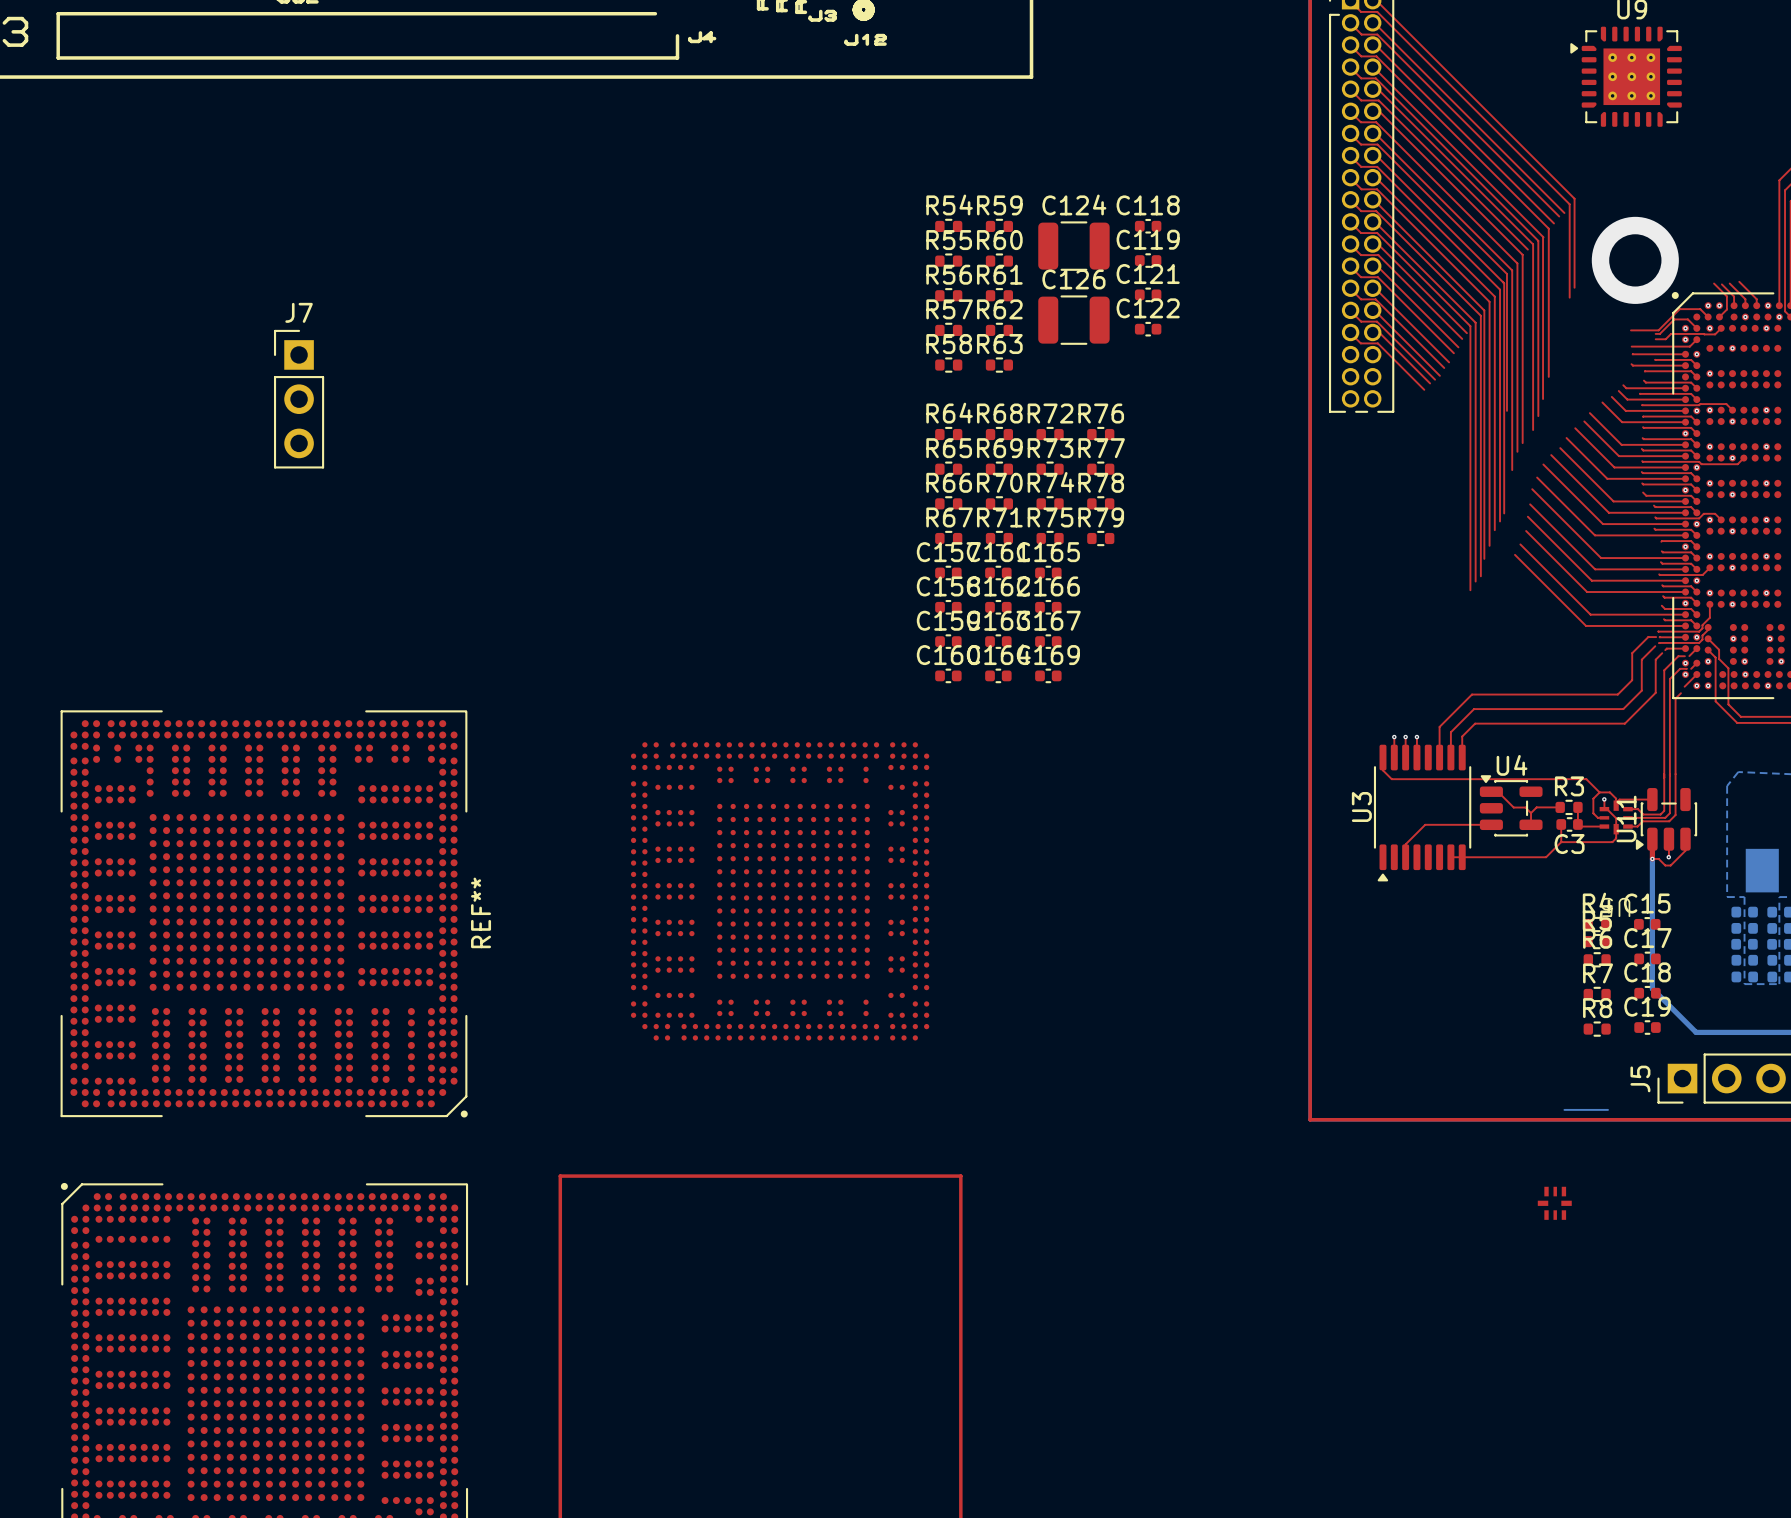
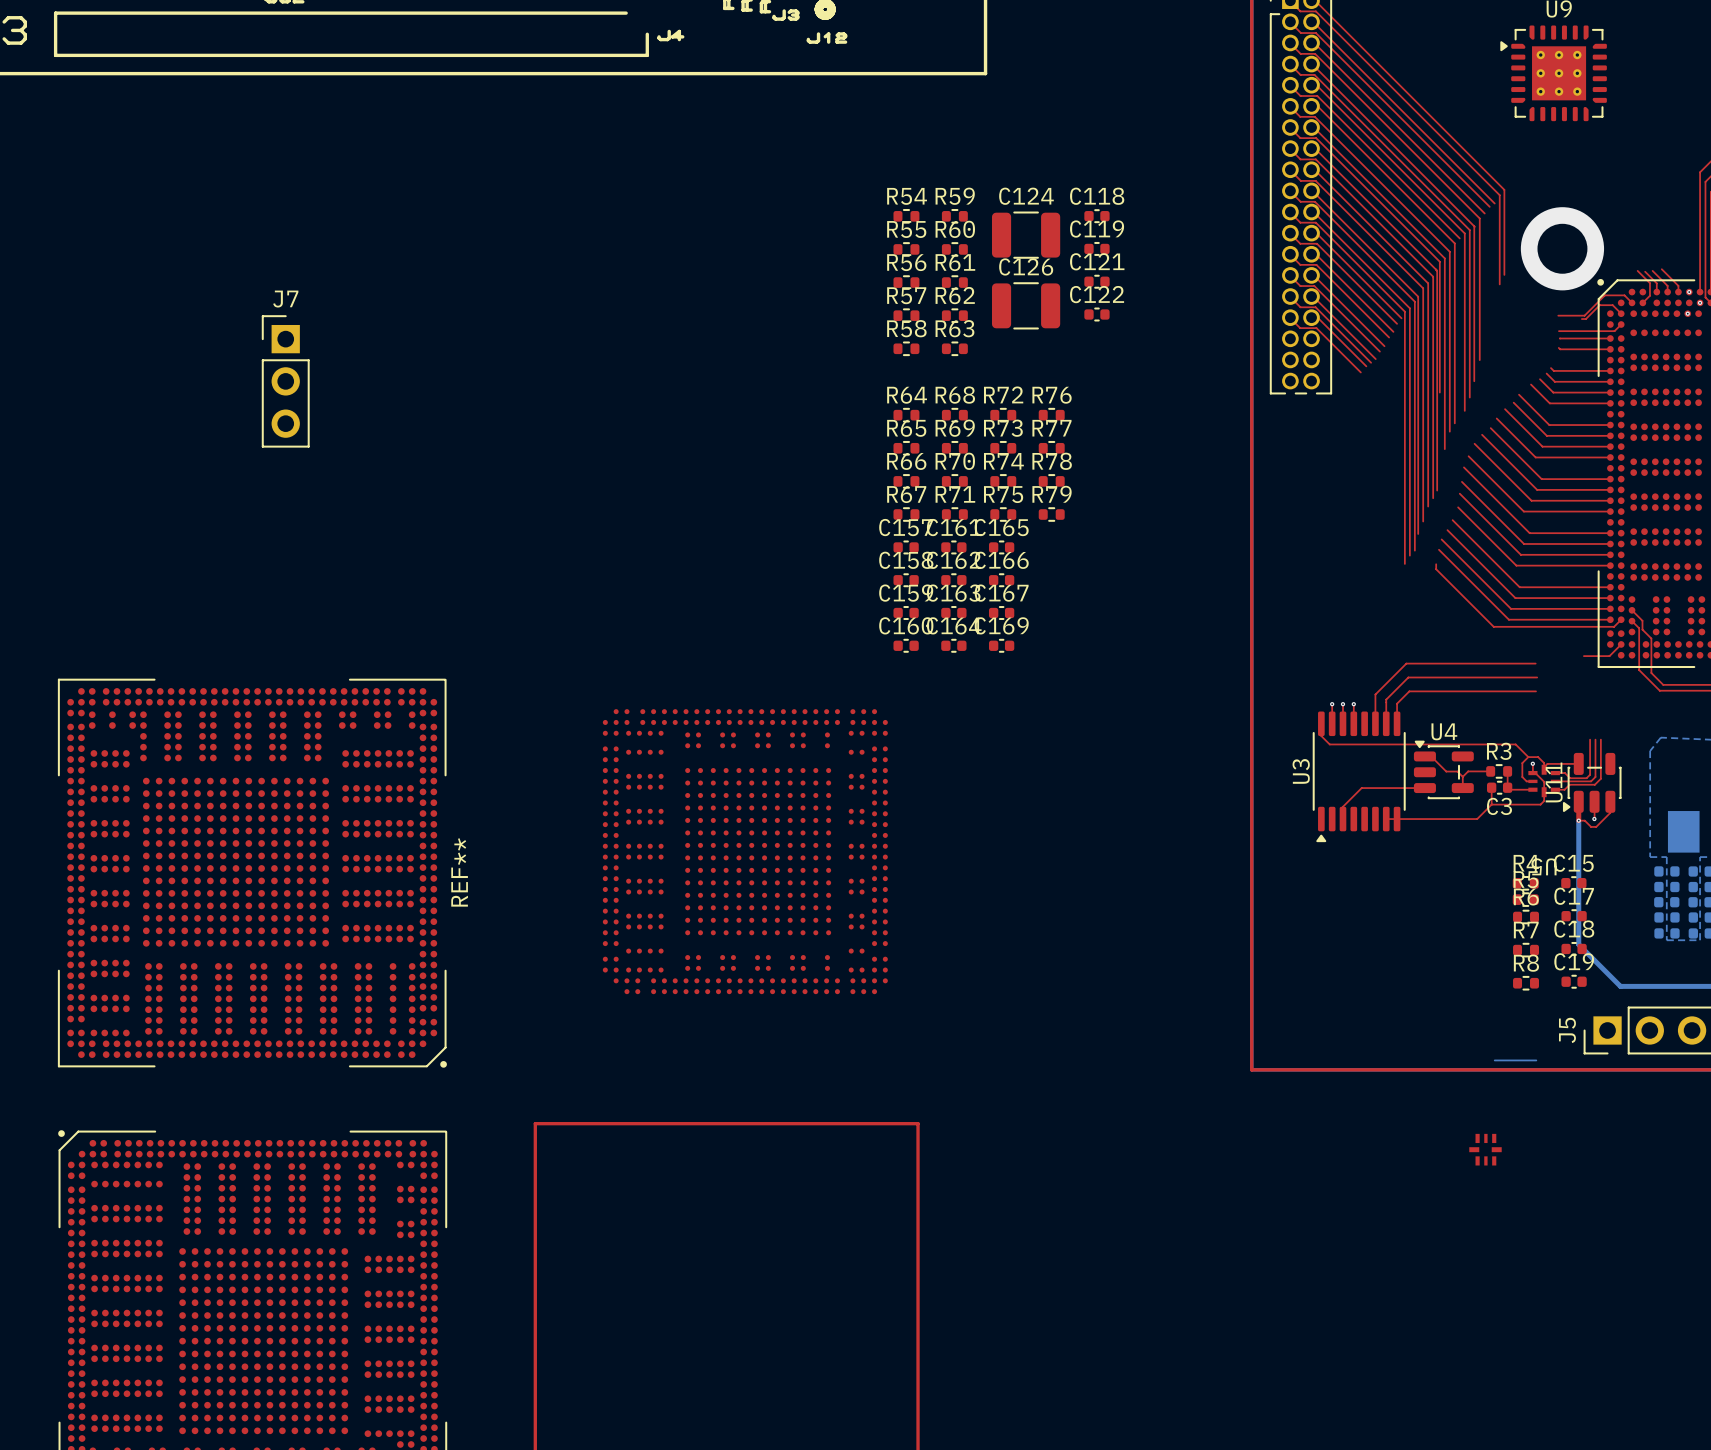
via: (1708, 305) -> none
via: (1719, 305) -> none
via: (1745, 317) -> none
via: (1685, 328) -> none
via: (1709, 328) -> none
top track: (1721, 328) (1715, 334) (1671, 333) (1665, 339) (1655, 339) -> none
via: (1685, 339) -> none
via: (1732, 348) -> none
via: (1696, 354) -> none
top track: (1655, 359) (1691, 359) (1696, 365) -> none
top track: (1645, 371) (1691, 371) (1696, 376) -> none
via: (1709, 373) -> none
top track: (1643, 380) (1645, 382) (1691, 382) (1696, 388) -> none
top track: (1640, 393) (1691, 393) (1696, 399) -> none
top track: (1642, 405) (1726, 404) (1732, 410) -> none
via: (1696, 410) -> none
via: (1709, 410) -> none
via: (1766, 410) -> none
top track: (1643, 416) (1691, 416) (1696, 422) -> none
via: (1732, 421) -> none
top track: (1643, 427) (1691, 427) (1696, 433) -> none
via: (1685, 433) -> none
top track: (1642, 438) (1691, 439) (1696, 444) -> none
via: (1709, 446) -> none
via: (1766, 446) -> none
top track: (1641, 448) (1691, 450) (1696, 456) -> none
via: (1732, 458) -> none
top track: (1743, 458) (1737, 464) (1642, 461) -> none
via: (1696, 467) -> none
top track: (1641, 472) (1691, 473) (1696, 478) -> none
top track: (1642, 483) (1691, 484) (1696, 490) -> none
via: (1709, 483) -> none
via: (1766, 483) -> none
via: (1685, 490) -> none
top track: (1643, 492) (1646, 495) (1691, 495) (1696, 501) -> none
via: (1732, 494) -> none
top track: (1653, 505) (1691, 507) (1696, 512) -> none
top track: (1655, 517) (1699, 518) (1703, 513) (1715, 513) (1721, 519) -> none
via: (1709, 519) -> none
via: (1766, 519) -> none
via: (1696, 524) -> none
top track: (1654, 528) (1691, 529) (1696, 535) -> none
via: (1732, 531) -> none
top track: (1661, 541) (1691, 541) (1696, 546) -> none
via: (1685, 546) -> none
top track: (1661, 551) (1691, 552) (1696, 558) -> none
via: (1709, 556) -> none
via: (1766, 556) -> none
top track: (1660, 562) (1691, 563) (1696, 569) -> none
top track: none -> (1441, 539) (1511, 608) (1585, 608)
top track: (1709, 567) (1702, 575) (1659, 574) -> none
via: (1732, 567) -> none
via: (1696, 580) -> none
top track: (1662, 585) (1691, 586) (1696, 592) -> none
top track: none -> (1436, 564) (1436, 569) (1493, 626) (1614, 626)
via: (1709, 593) -> none
via: (1766, 593) -> none
top track: (1663, 596) (1691, 597) (1696, 603) -> none
via: (1685, 603) -> none
top track: (1709, 604) (1709, 617) (1699, 631) (1658, 631) -> none
via: (1732, 604) -> none
top track: (1661, 605) (1665, 608) (1691, 608) (1696, 614) -> none
top track: (1663, 619) (1691, 620) (1696, 625) -> none
top track: (1708, 627) (1699, 642) (1659, 642) -> none
top track: (1656, 637) (1648, 637) (1632, 653) (1632, 680) (1617, 694) (1607, 694) -> none
via: (1696, 637) -> none
via: (1733, 638) -> none
via: (1769, 638) -> none
top track: (1655, 646) (1641, 659) (1641, 690) (1623, 709) (1608, 709) -> none
top track: (1666, 648) (1665, 650) -> (1592, 619) (1508, 619) (1438, 549)
top track: (1662, 653) (1655, 659) (1655, 692) (1624, 723) (1607, 723) -> none
top track: (1684, 656) (1678, 656) (1664, 670) (1664, 777) -> none
via: (1708, 661) -> none
via: (1744, 661) -> none
via: (1781, 661) -> none
via: (1685, 663) -> none
top track: (1696, 663) (1691, 668) -> none
top track: (1686, 668) (1680, 668) (1669, 679) (1669, 775) -> none
via: (1685, 674) -> none
via: (1745, 674) -> none
via: (1696, 685) -> none
via: (1708, 685) -> none
via: (1768, 685) -> none
top track: none -> (1583, 656) (1609, 656)
top track: (1680, 693) (1675, 698) (1675, 774) -> none

